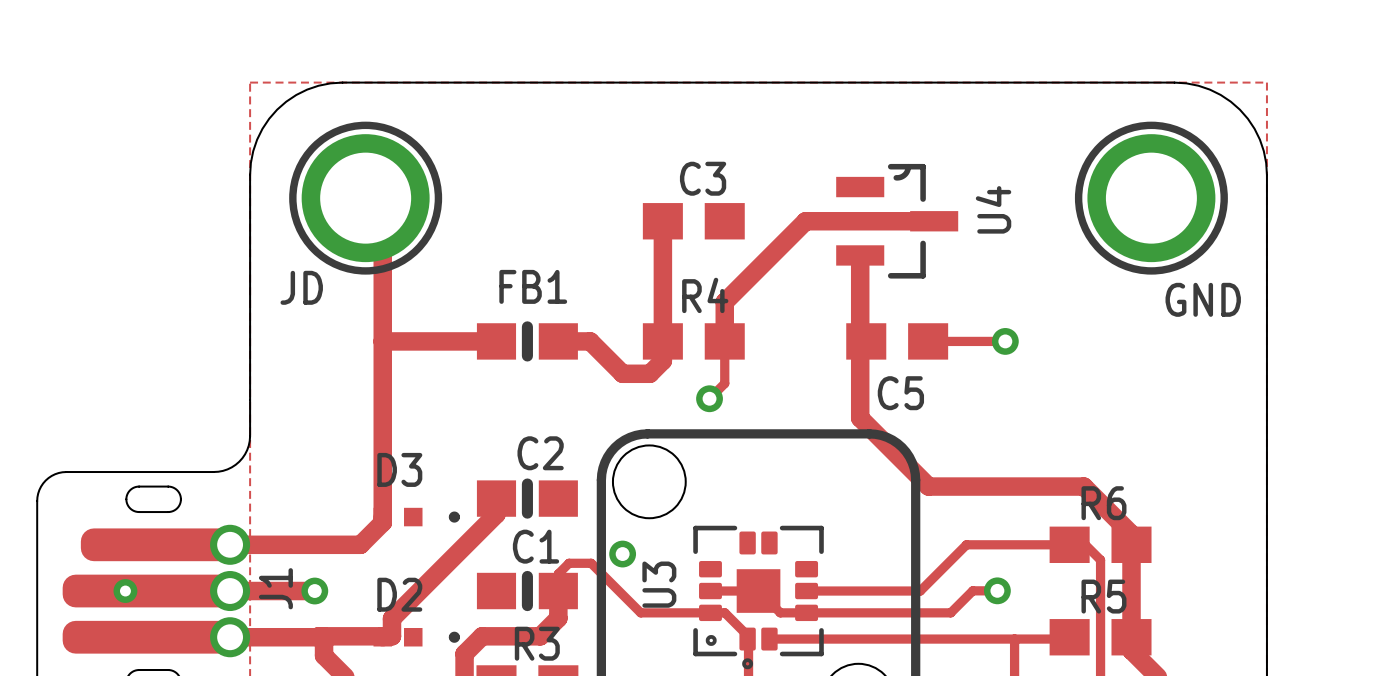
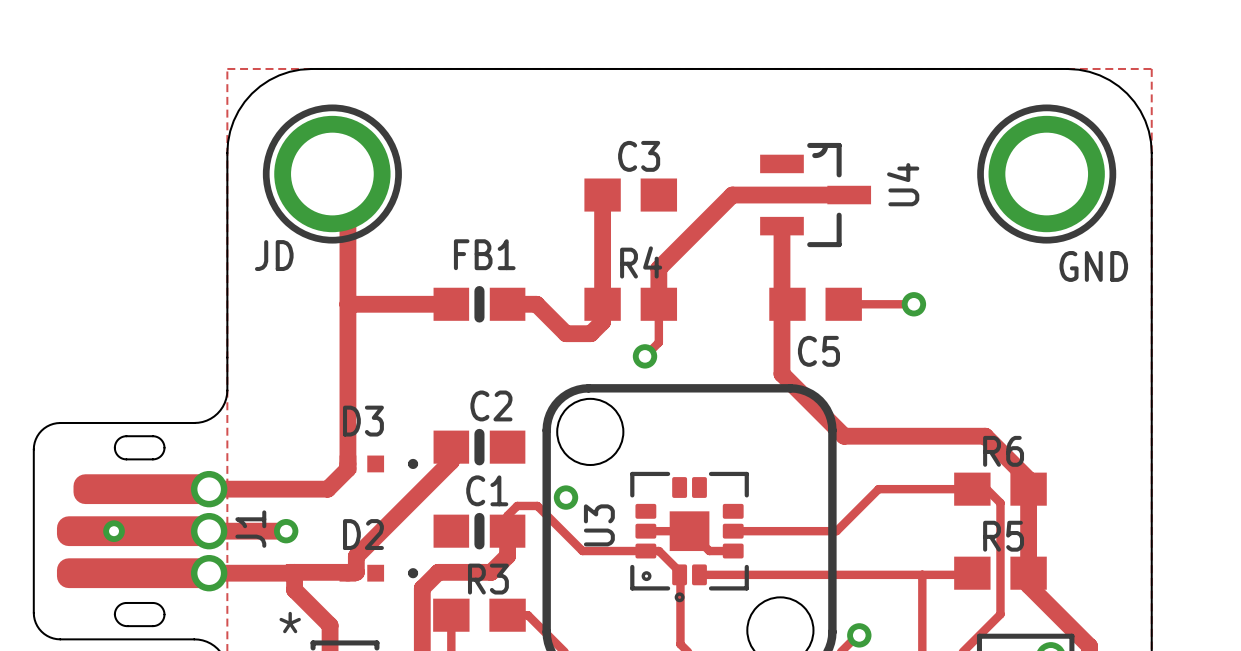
track: (997, 590) (972, 590) (950, 612) (806, 612) -> none
via: (997, 590) -> none

